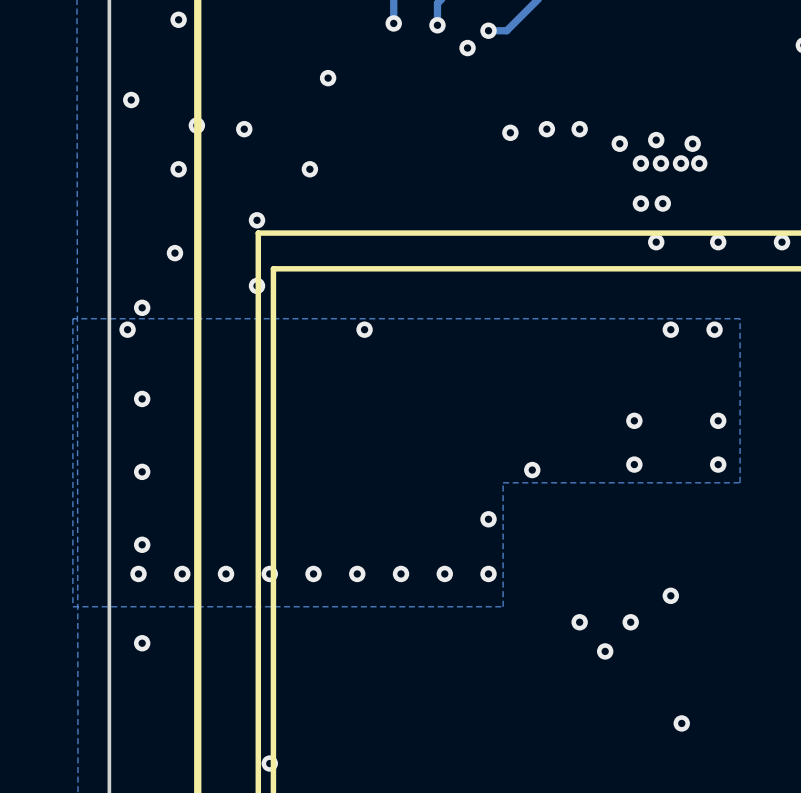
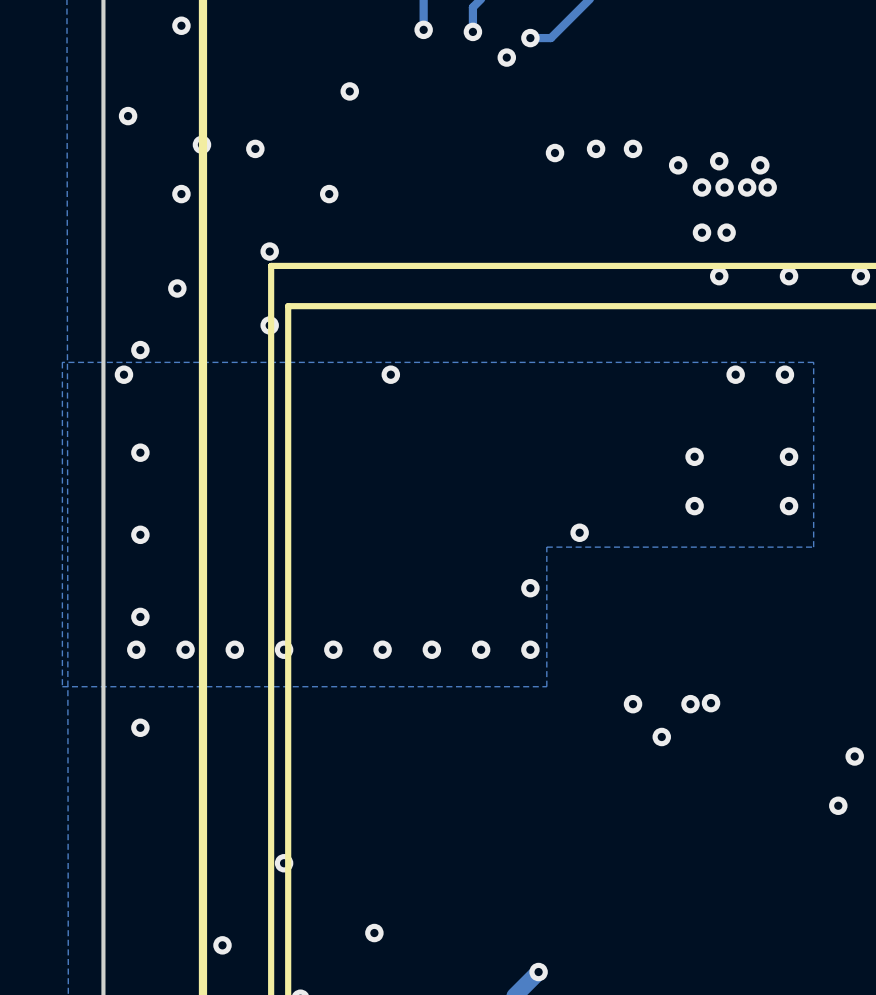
via: none -> (694, 456)
via: none -> (789, 456)
via: (634, 420) -> none
via: (718, 420) -> none
via: none -> (694, 506)
via: none -> (789, 506)
via: (634, 464) -> none
via: (718, 464) -> none
via position: (670, 595) -> (711, 703)
via: none -> (854, 756)
via: none -> (838, 805)
via: (681, 723) -> none

